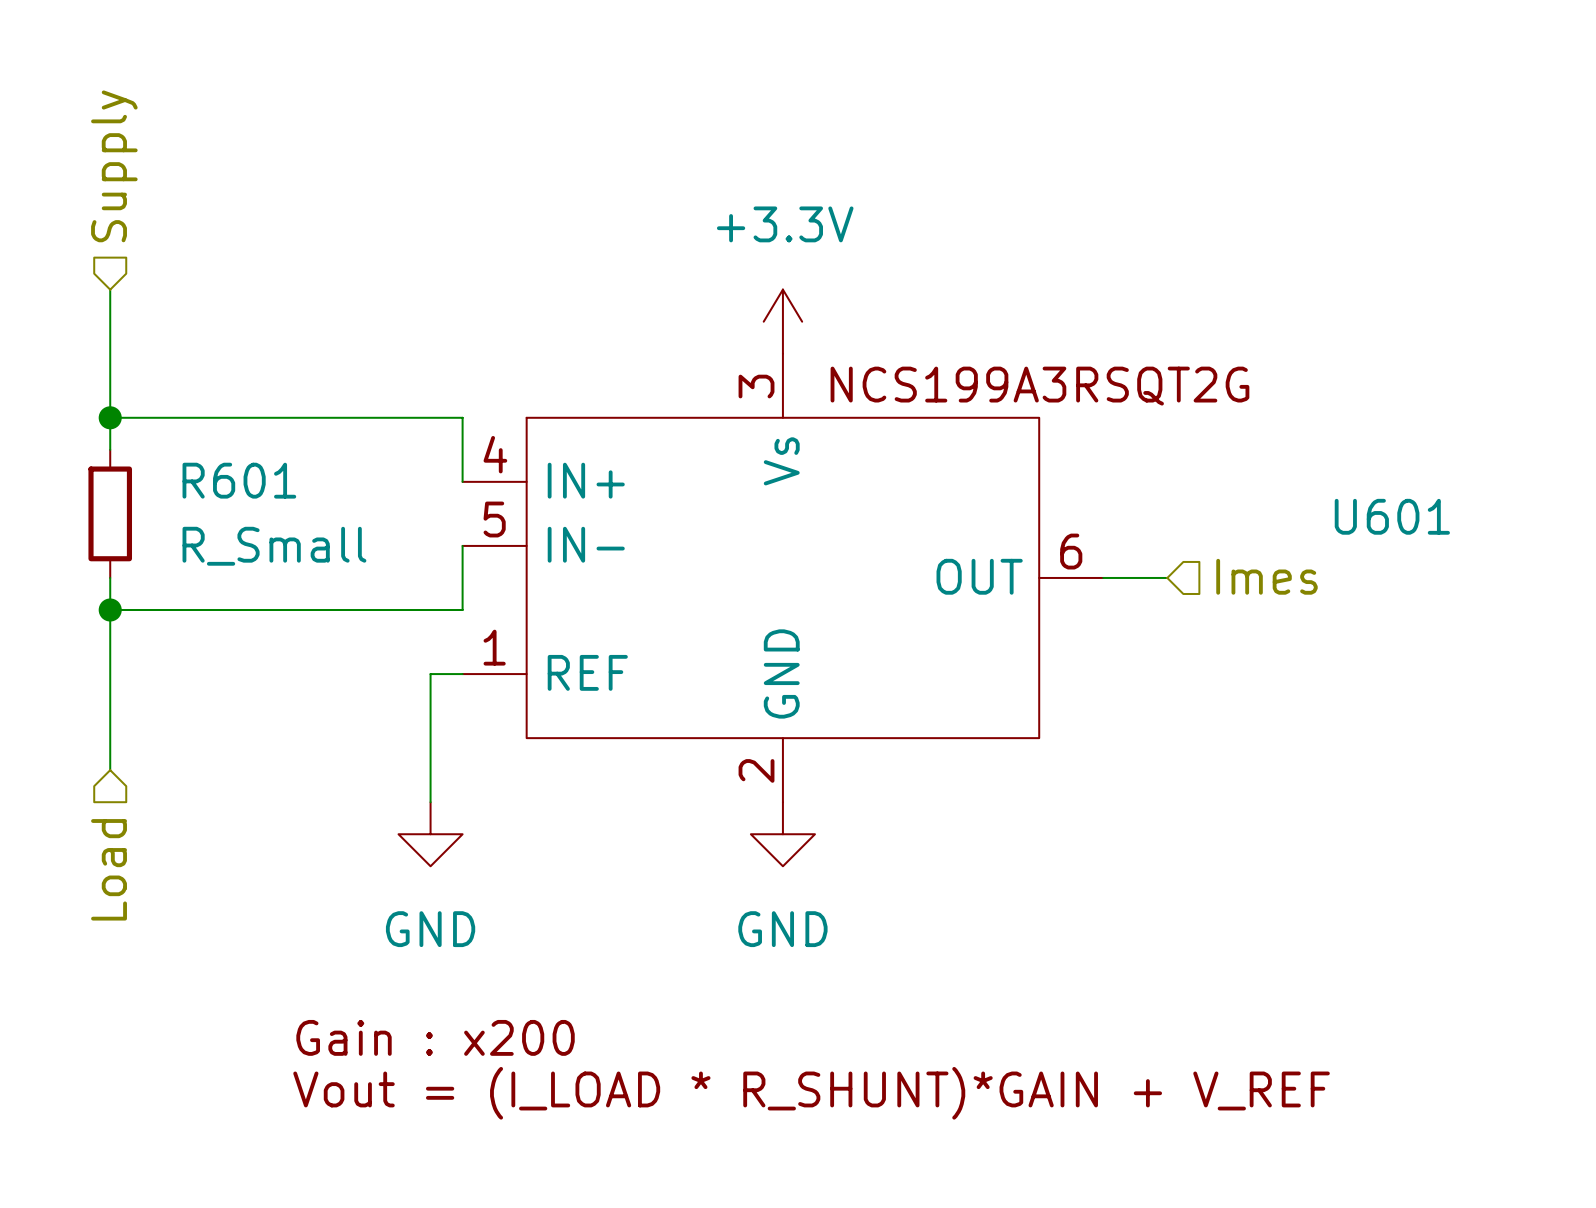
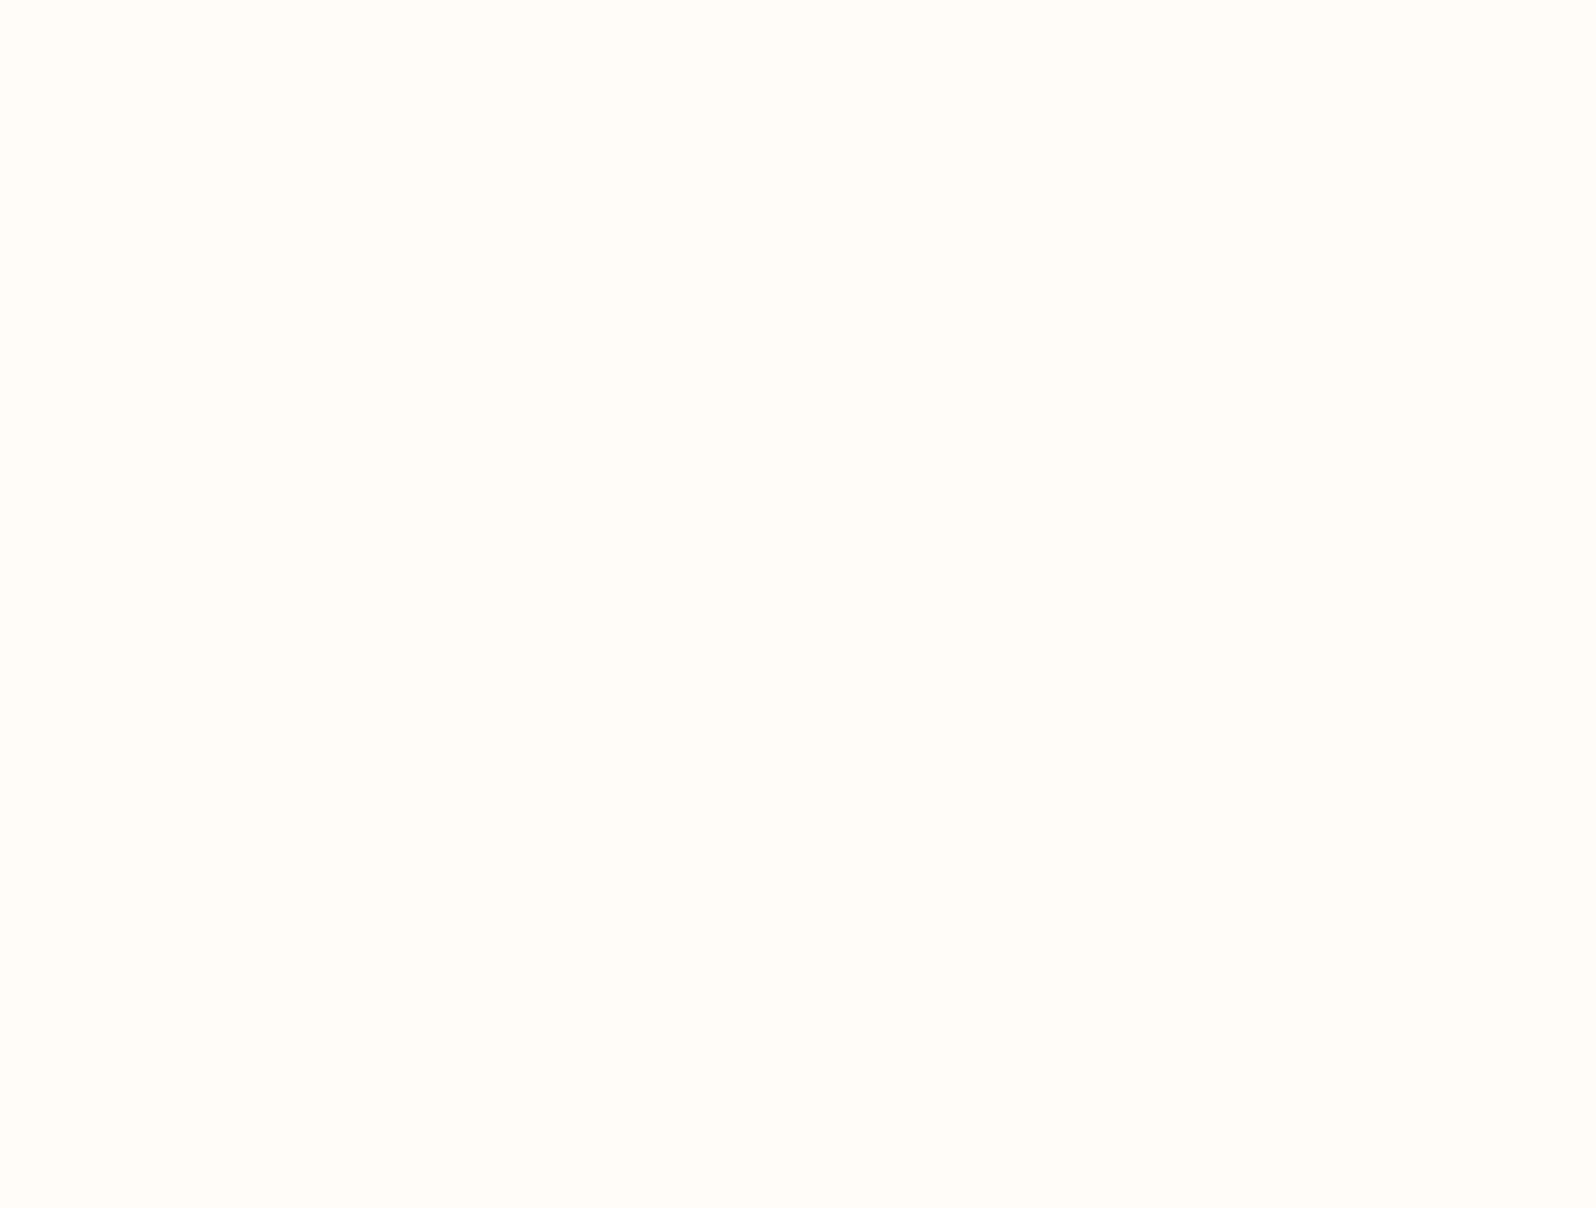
hierarchical label: Supply (114, 166) -> none
wire: (110, 289) (110, 449) -> none
power symbol: +3.3V (782, 321) -> none
wire: (110, 417) (462, 417) (462, 481) -> none
junction: (110, 417) -> none
R601: R_Small (110, 513) -> none
wire: (462, 545) (462, 610) (110, 610) -> none
hierarchical label: Imes (1266, 576) -> none
wire: (110, 577) (110, 770) -> none
U601: (782, 577) -> none
wire: (1103, 577) (1167, 577) -> none
junction: (110, 610) -> none
wire: (462, 674) (430, 674) (430, 802) -> none
power symbol: GND (430, 834) -> none
power symbol: GND (782, 834) -> none
hierarchical label: Load (109, 869) -> none

